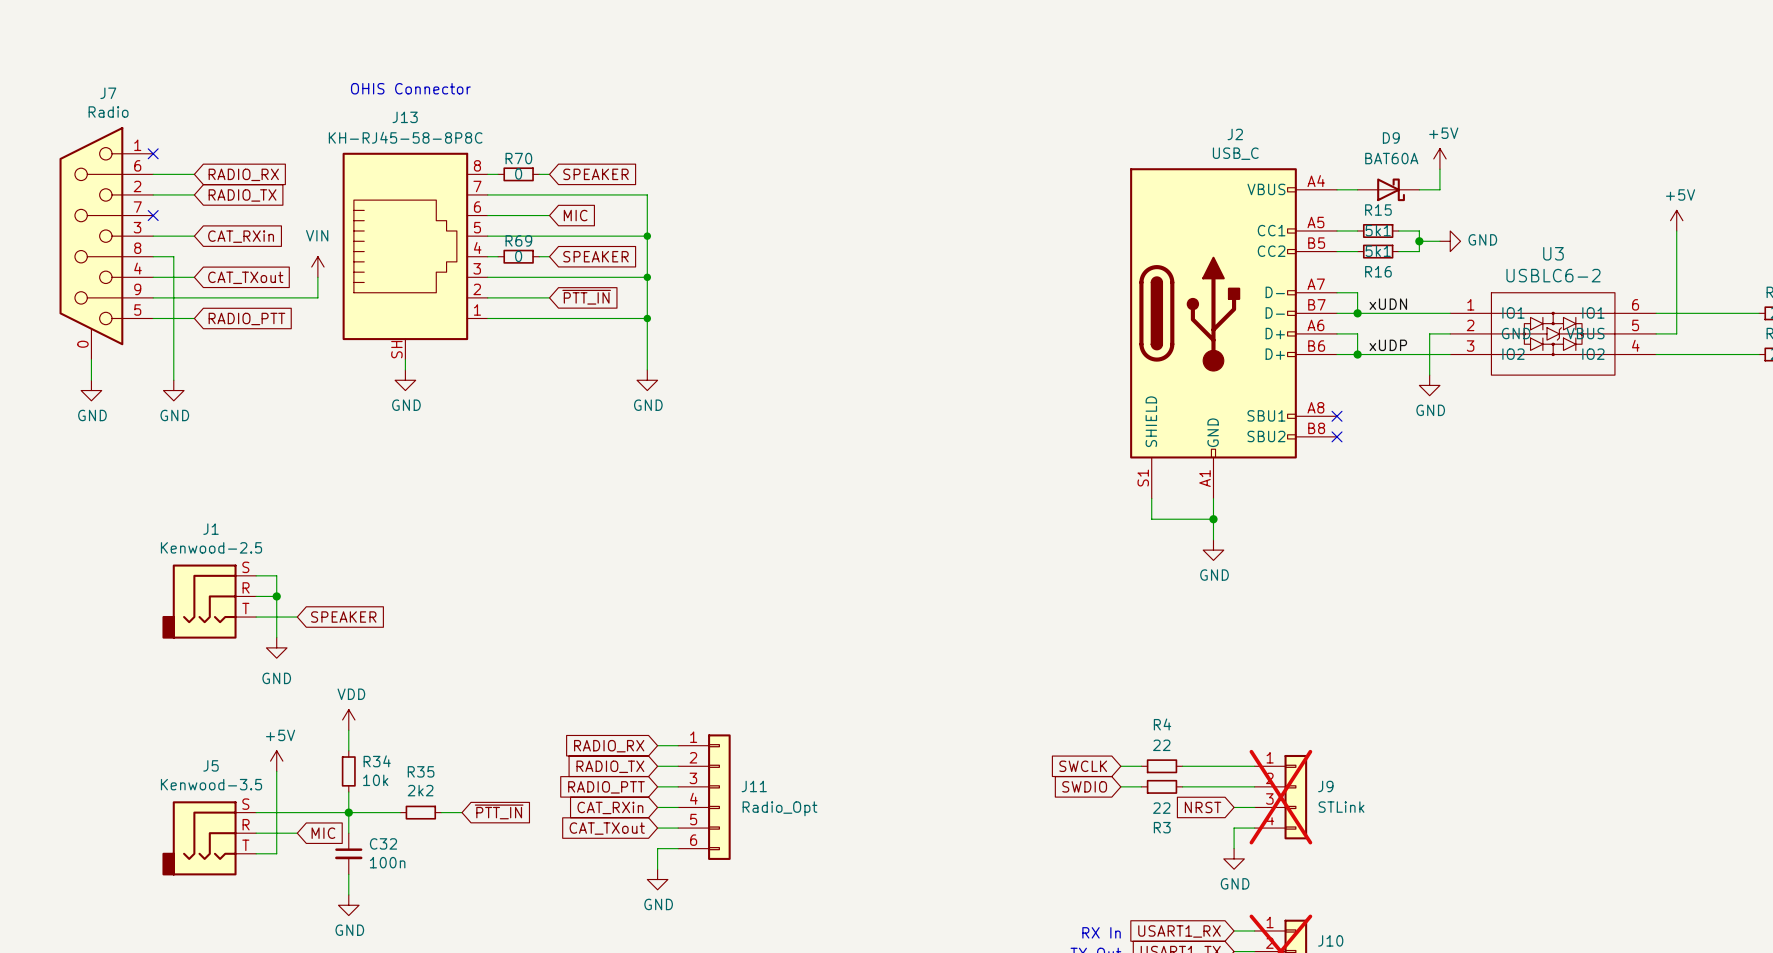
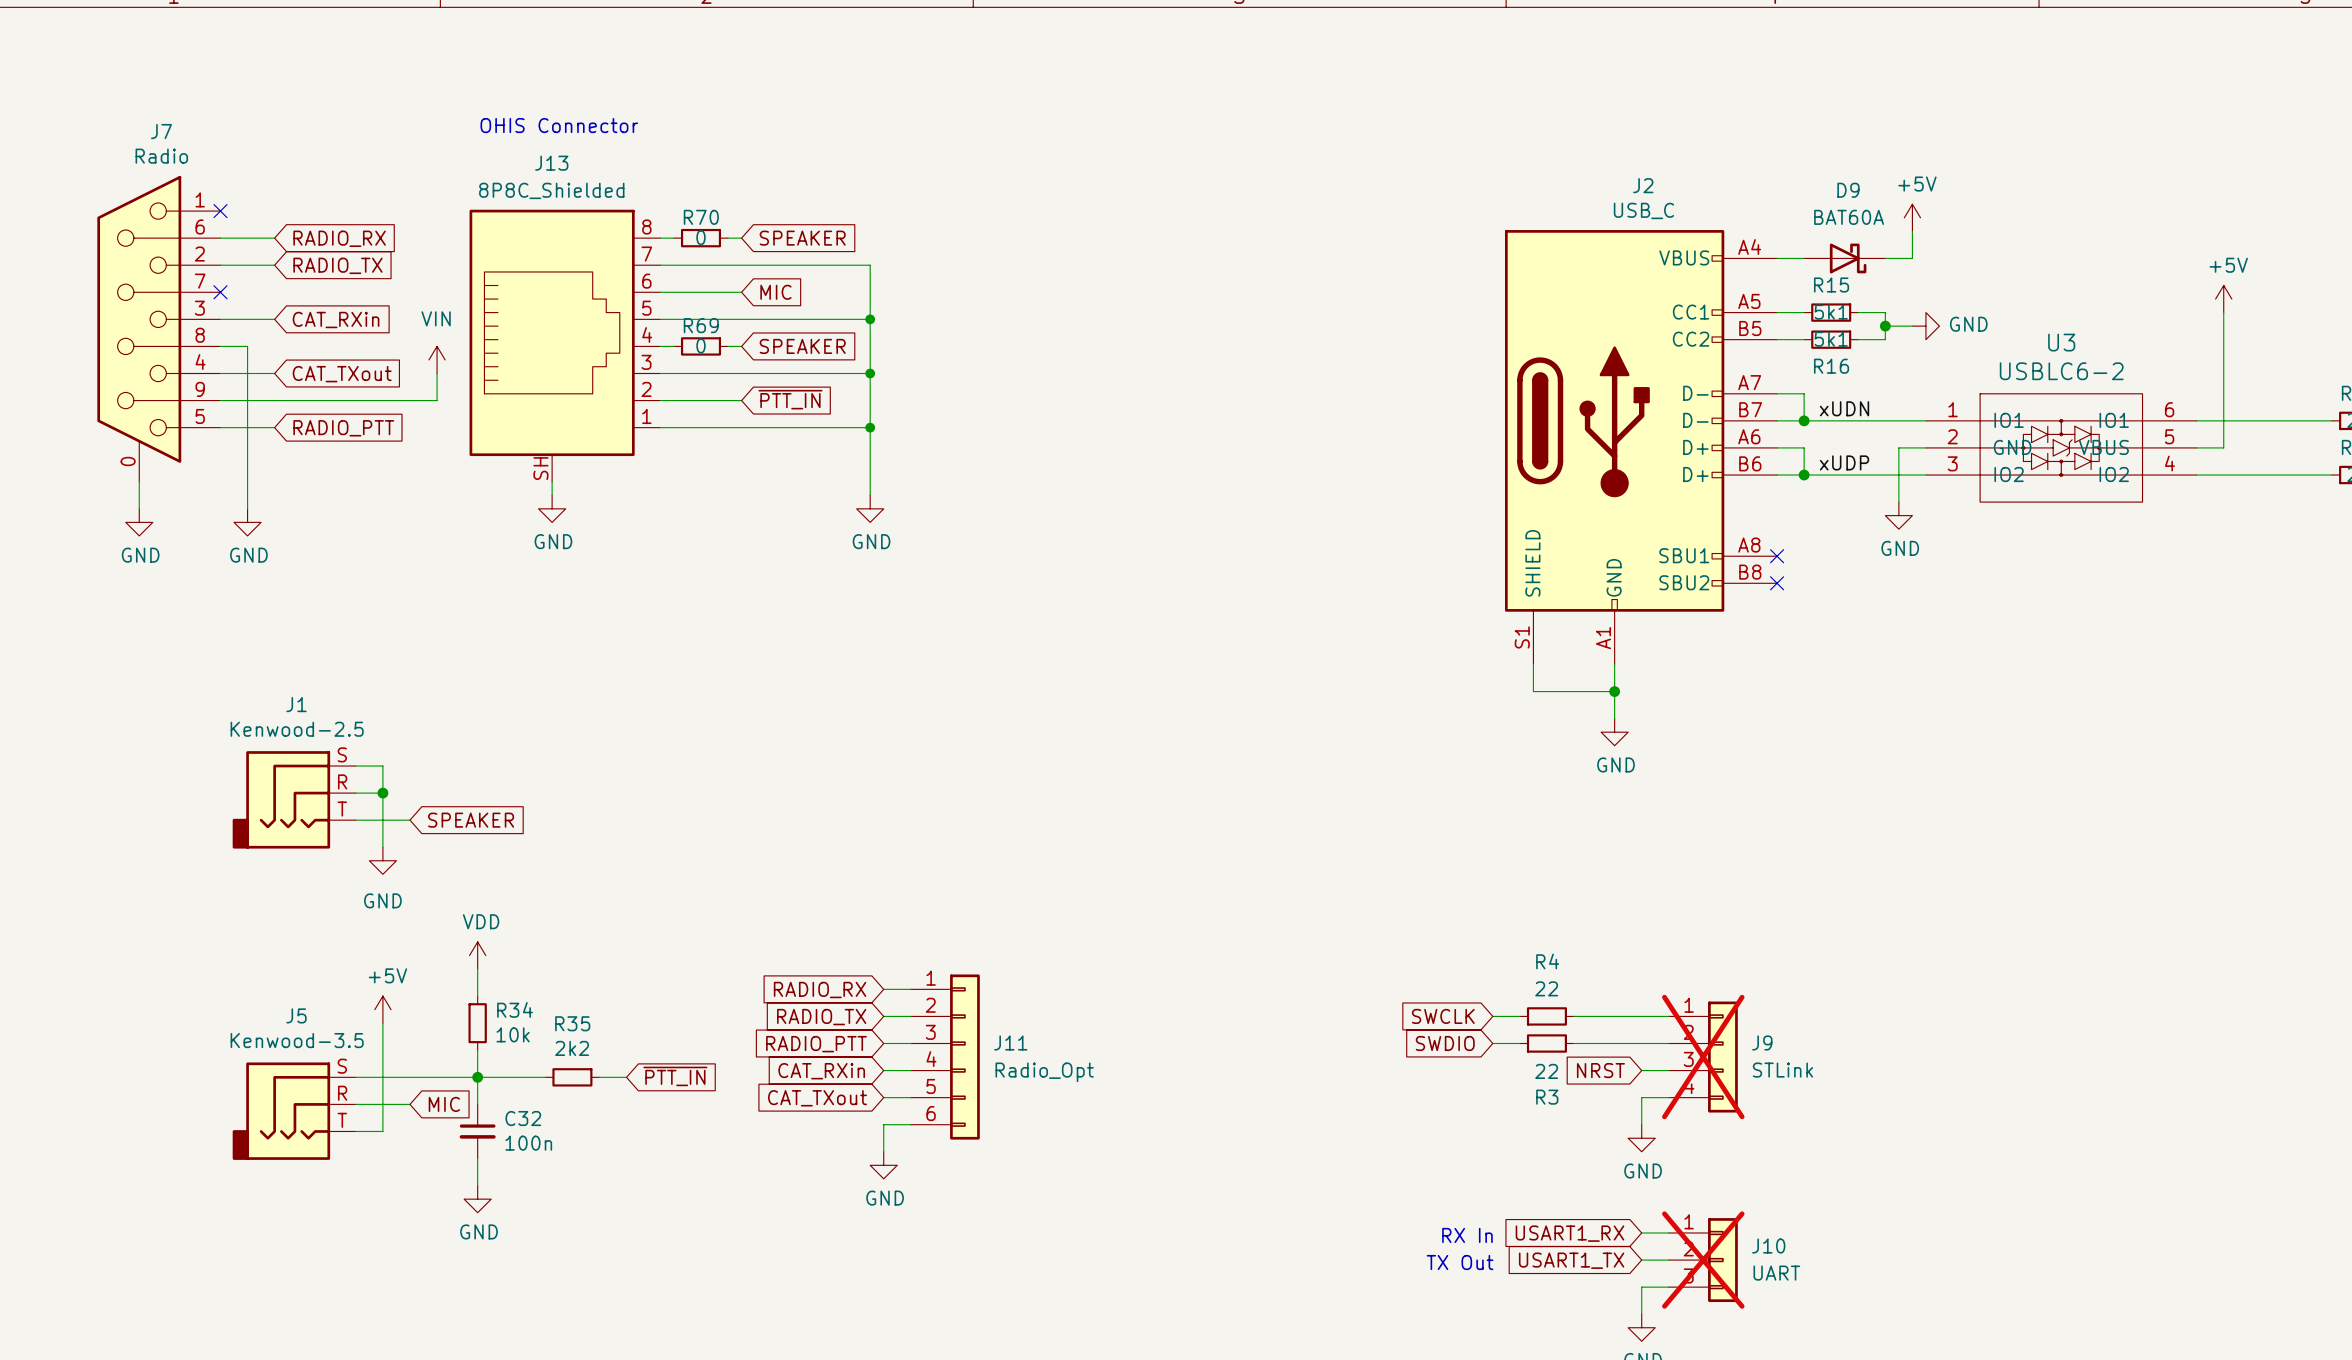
J13 value: KH-RJ45-58-8P8C (405, 137) -> 8P8C_Shielded (551, 190)

